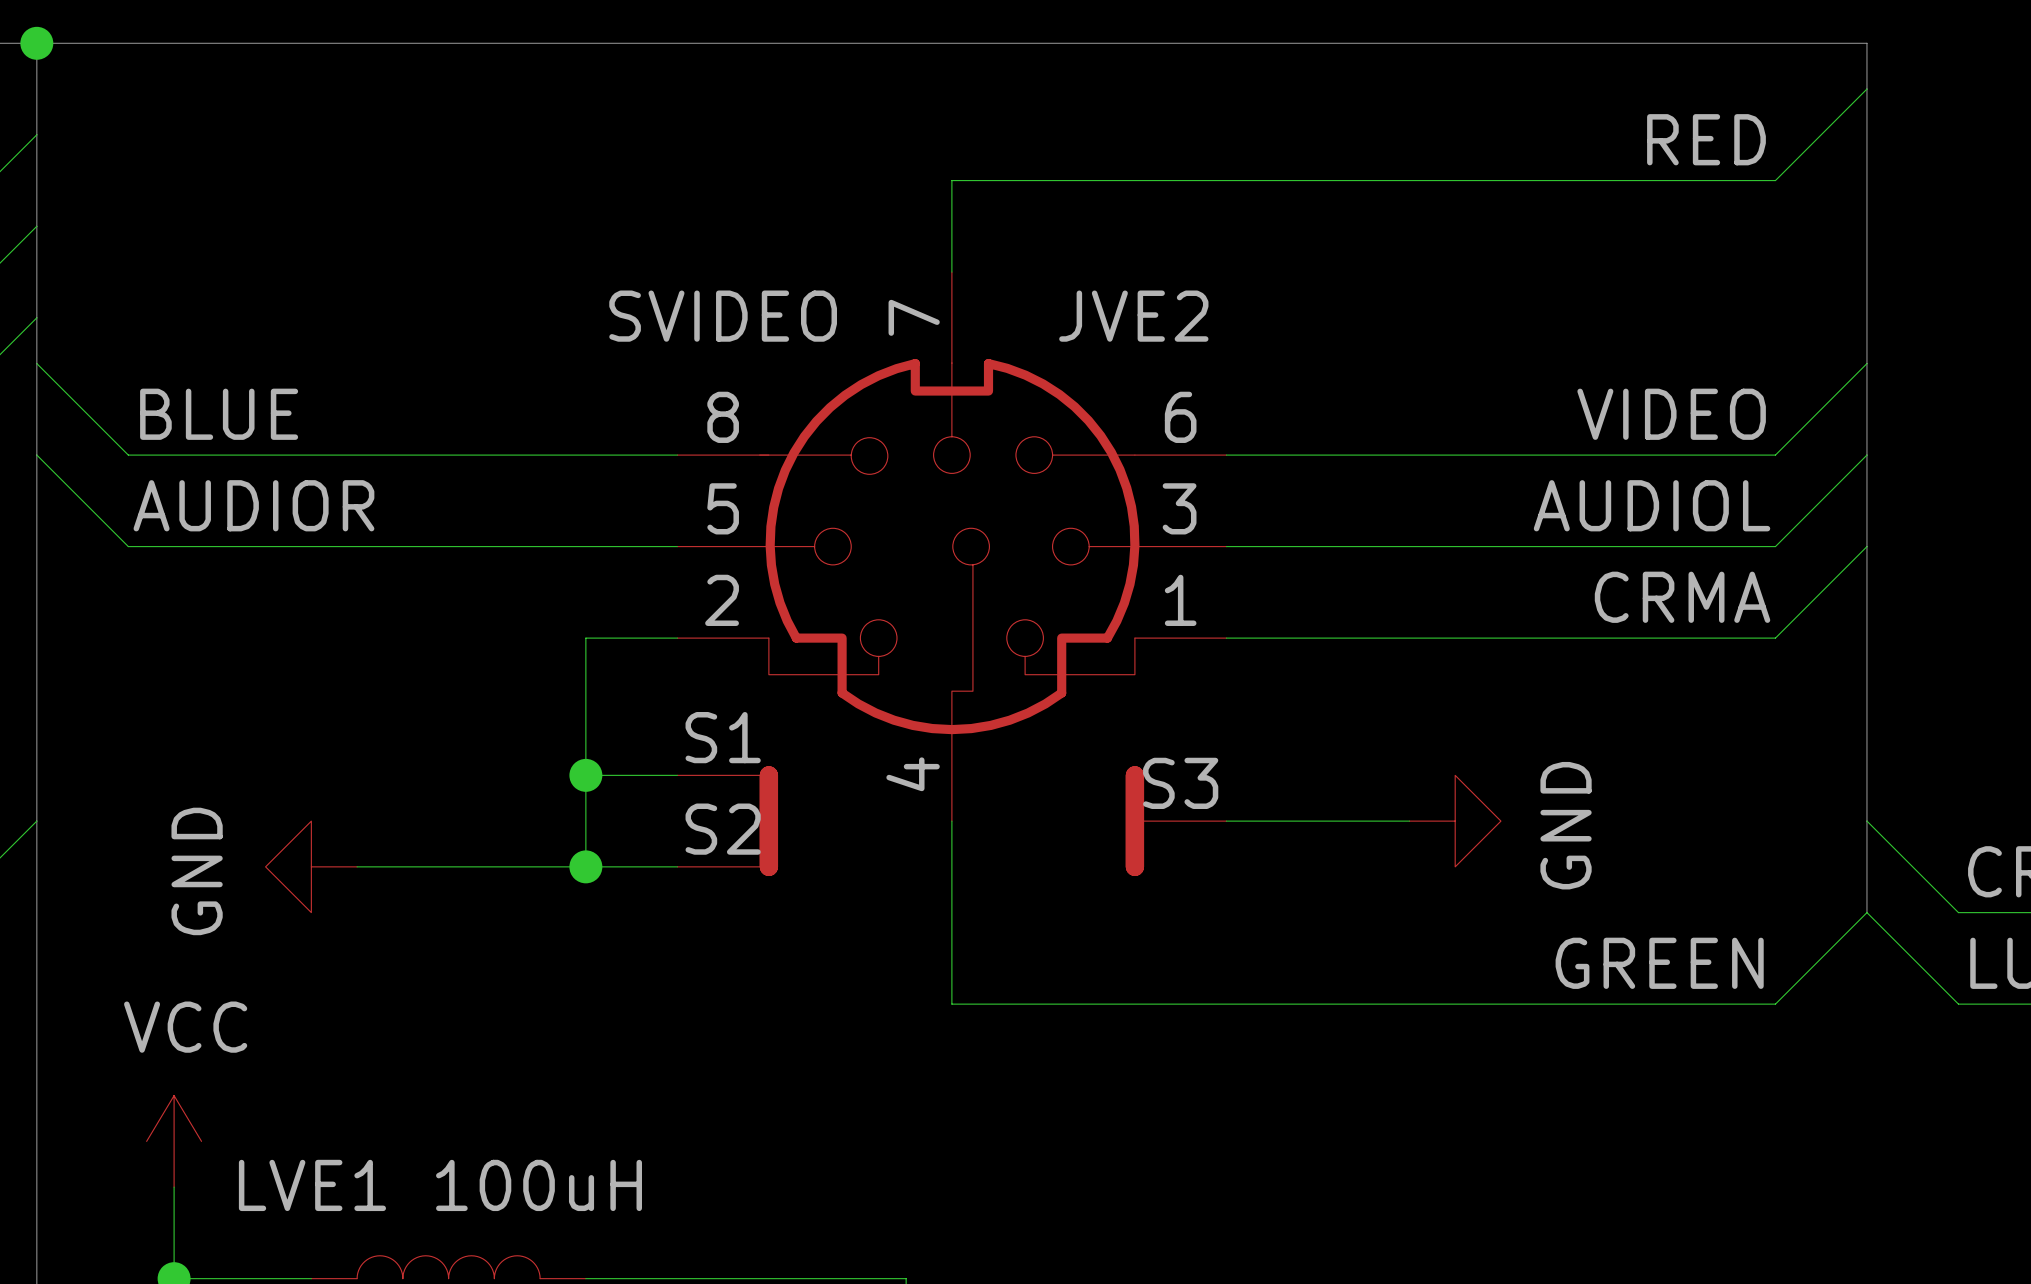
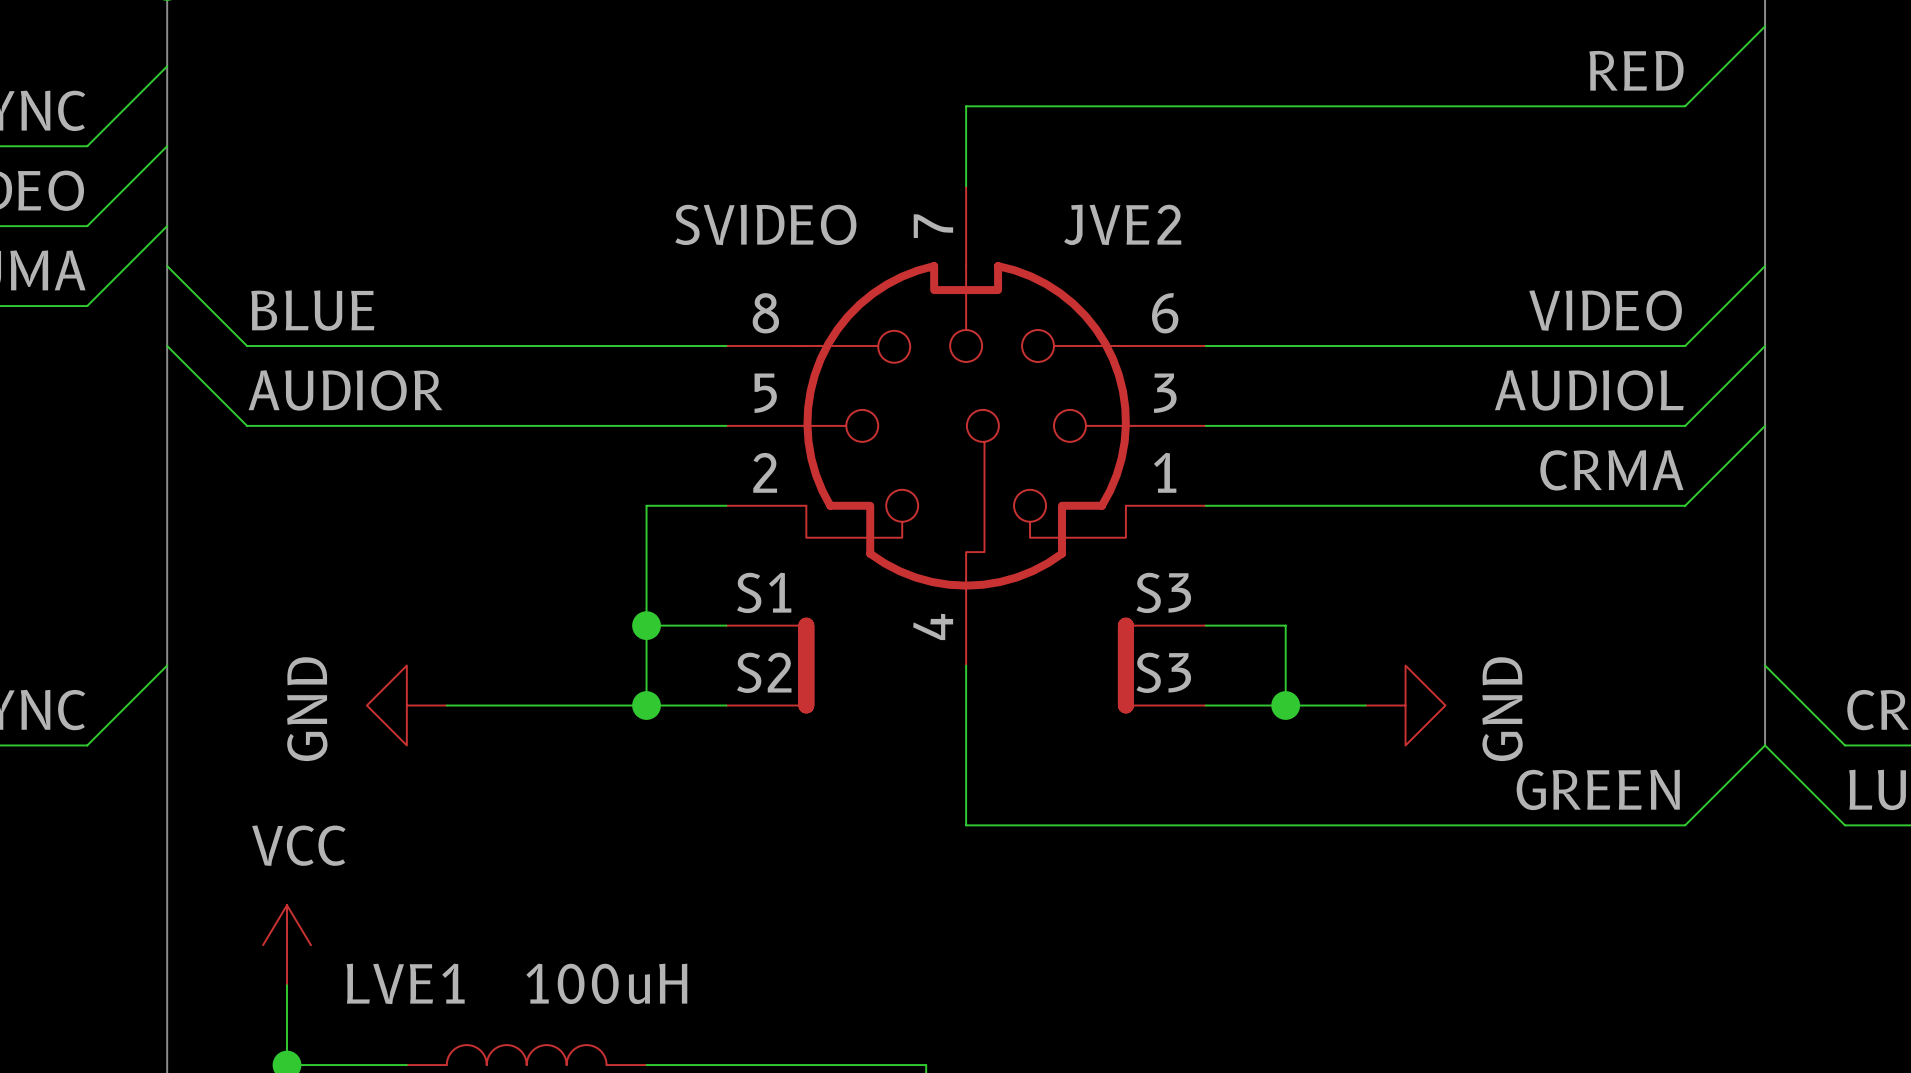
JVE2 symbol: [677, 272, 1227, 877] -> [726, 186, 1206, 714]
wire: none -> (1205, 625) (1285, 625) (1285, 705)
wire: (1226, 821) (1409, 821) -> (1205, 705) (1365, 705)
power symbol position: GND (1455, 821) -> GND (1405, 705)
junction: none -> (1285, 705)

